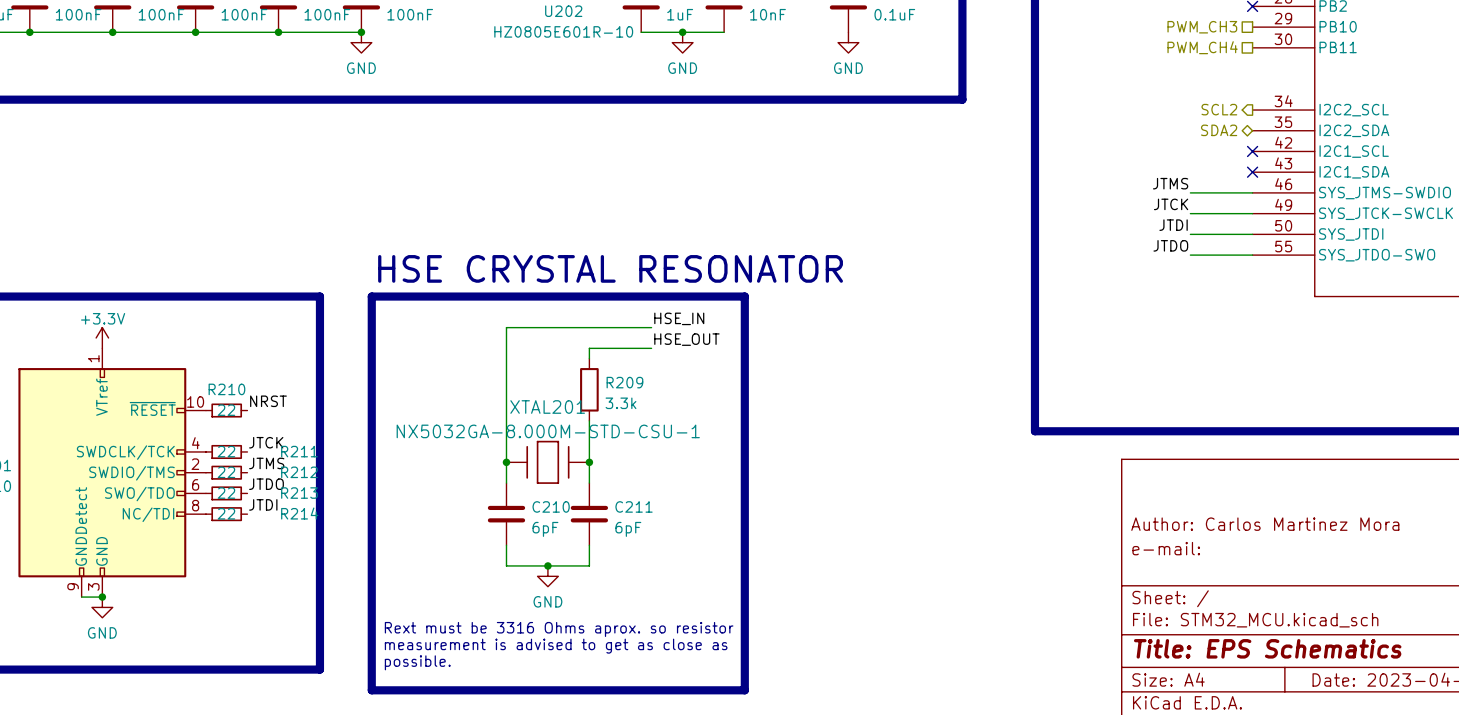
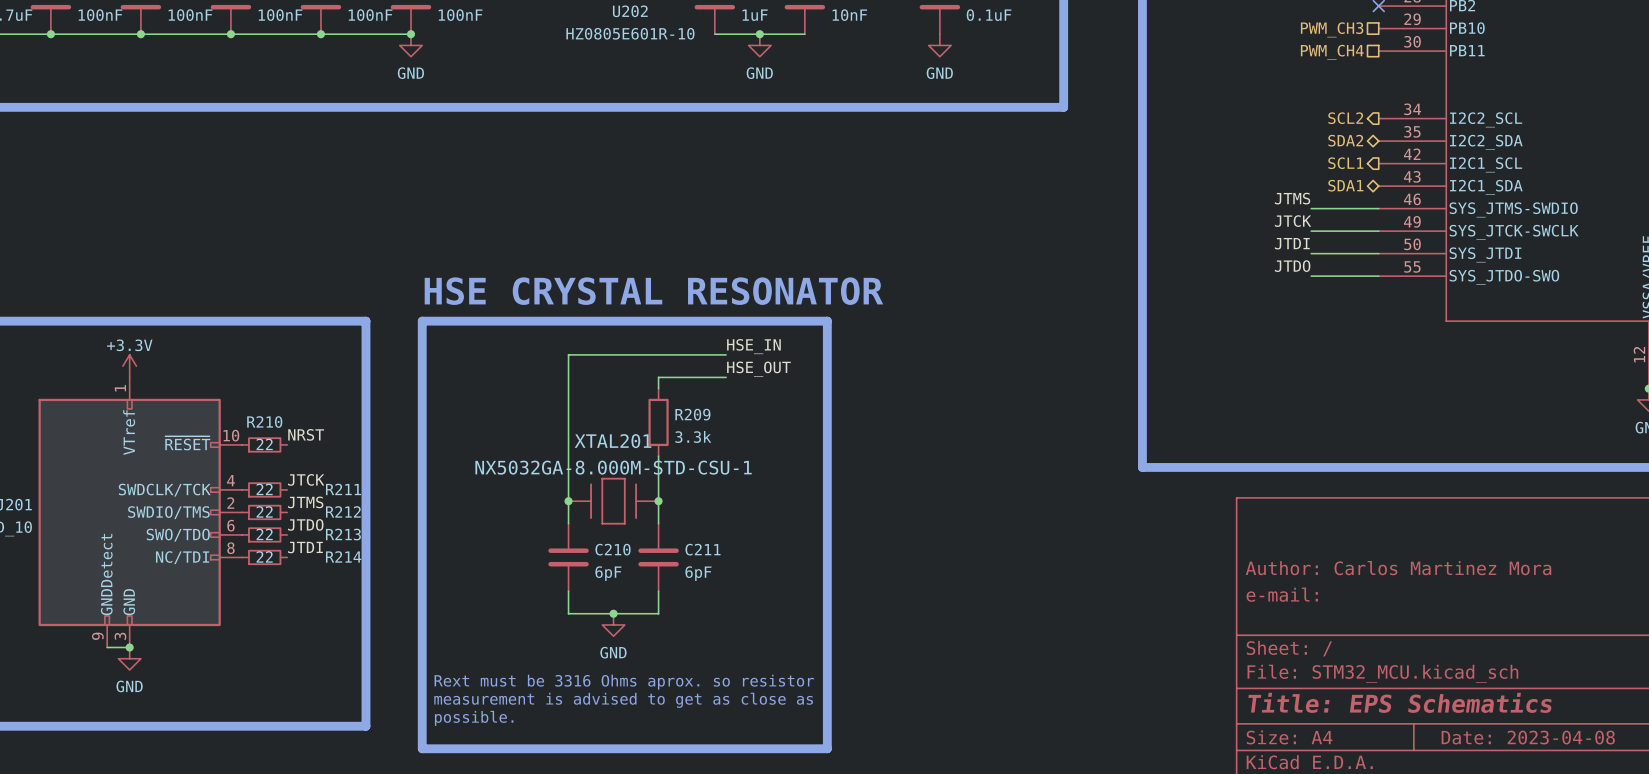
hierarchical label: none -> SCL1 (1345, 163)
no-connect mark: (1252, 151) -> none
hierarchical label: none -> SDA1 (1345, 185)
no-connect mark: (1252, 172) -> none

